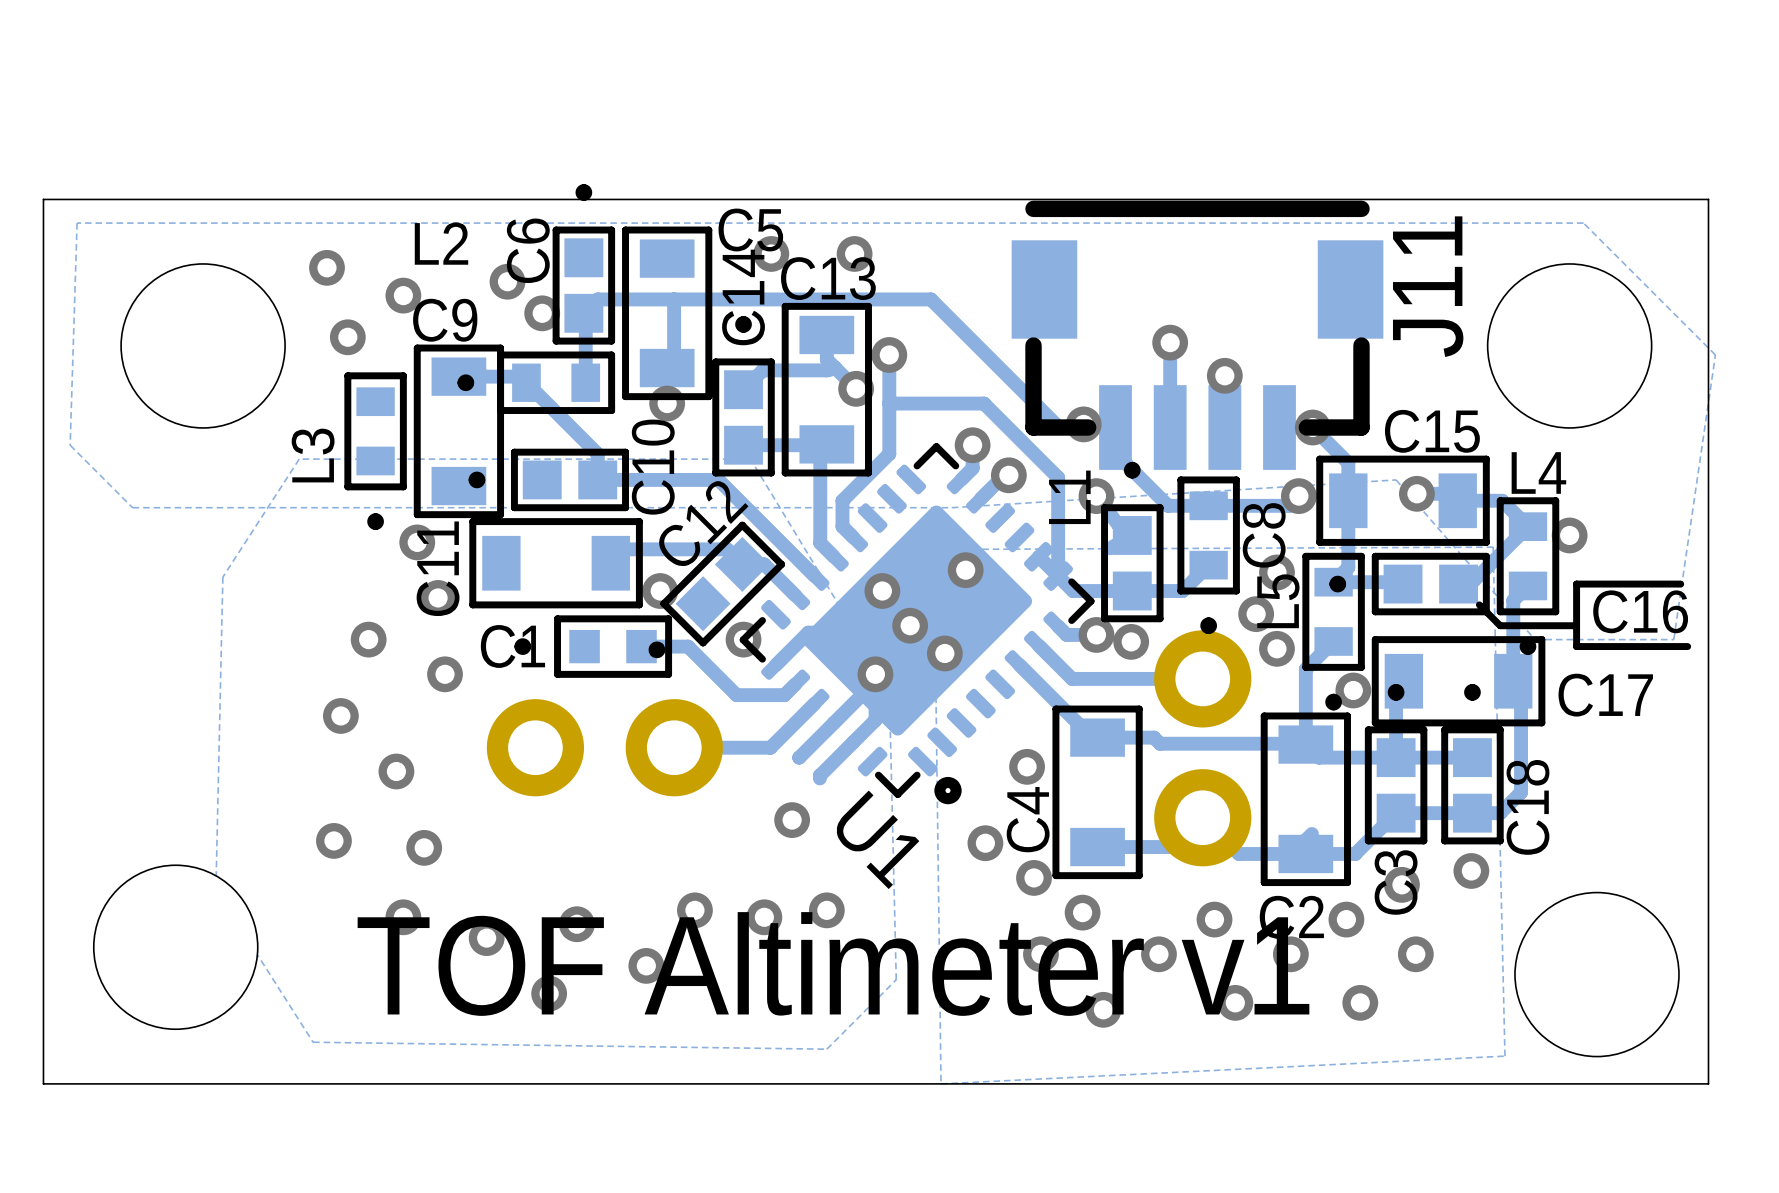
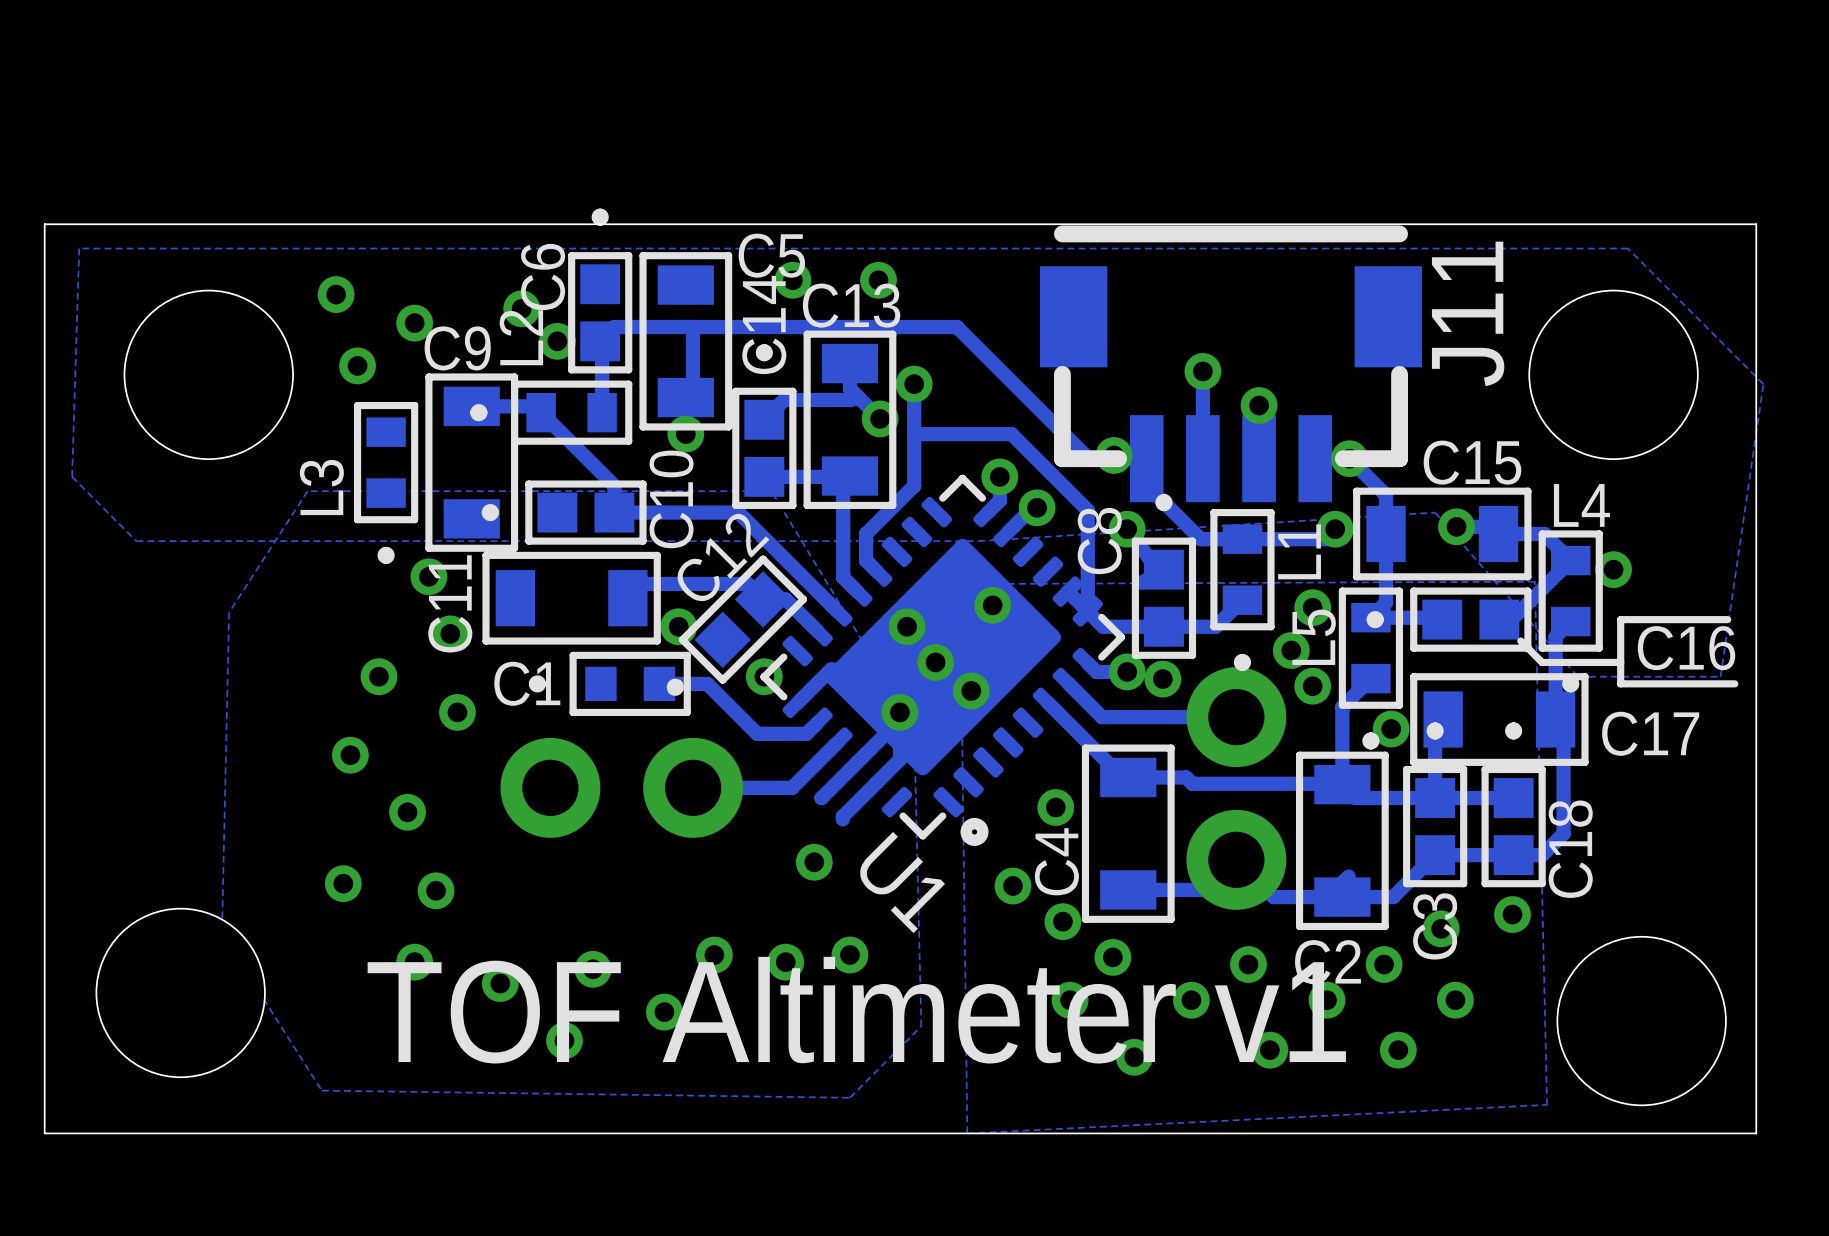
L2 name rotation: 0° (441, 243) -> 90° counterclockwise (521, 337)
L1 name position: L1 (1069, 497) -> L1 (1299, 551)
C8 name position: C8 (1264, 535) -> C8 (1099, 541)

